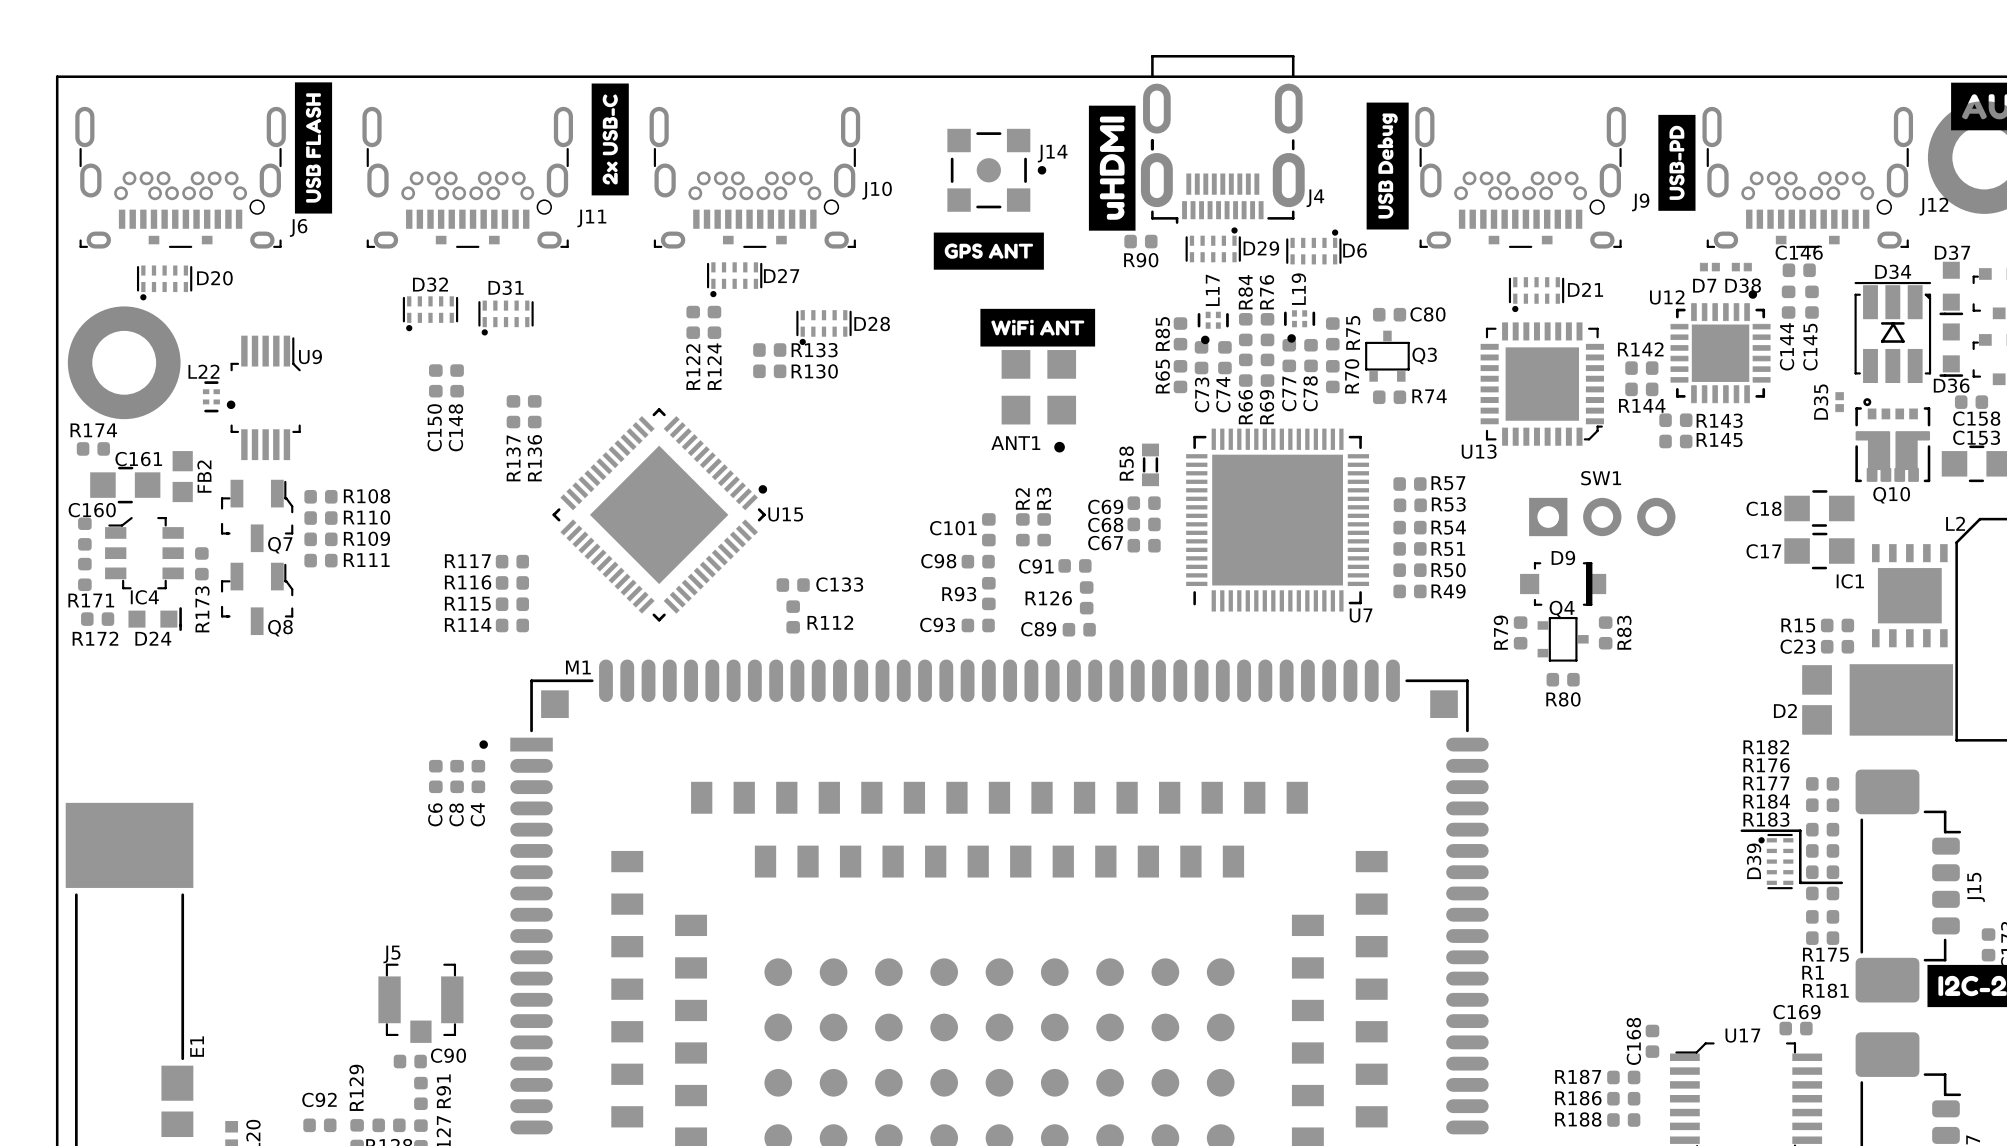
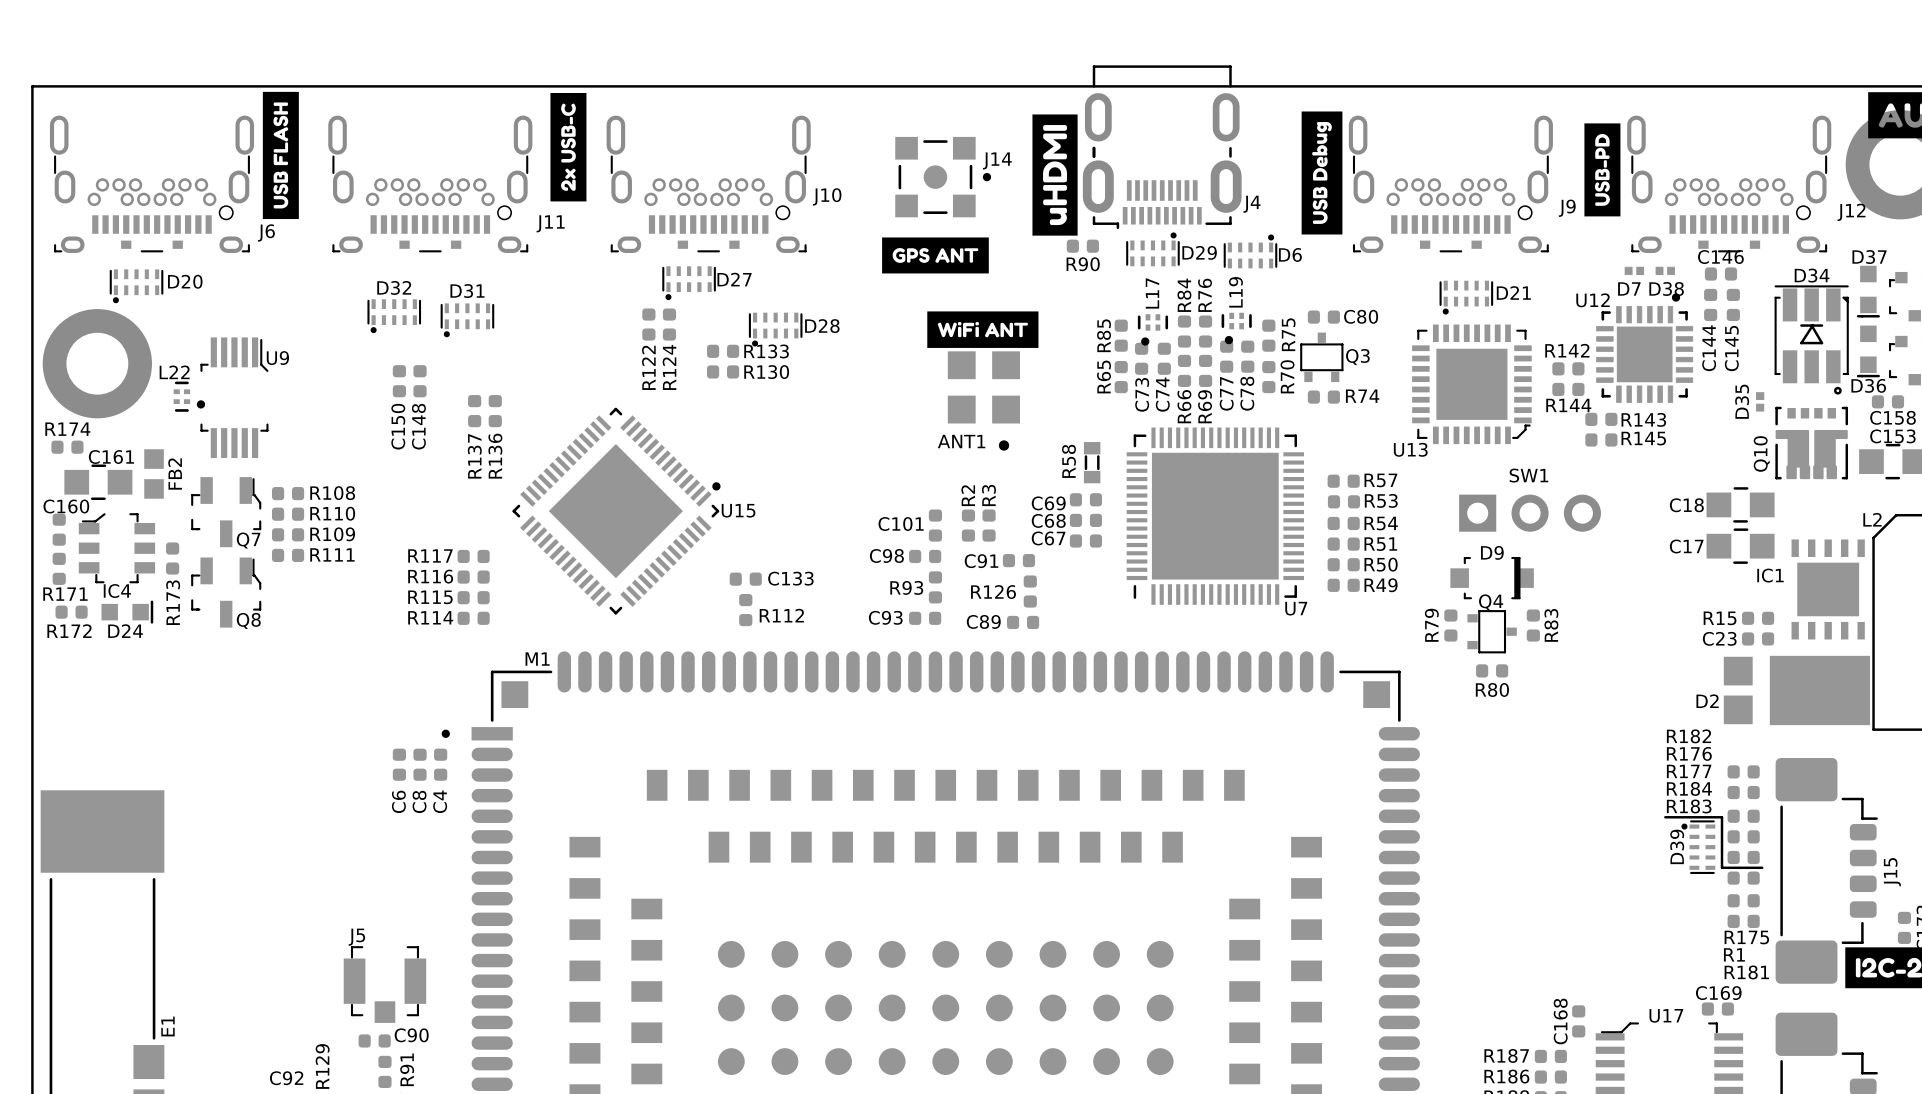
Q10 footprint: [1855, 398, 1931, 483] -> [1775, 386, 1849, 480]
Q10 name rotation: 0° (1891, 495) -> 90° counterclockwise (1761, 453)
Q10 name position: Q10 (1891, 495) -> Q10 (1761, 453)

